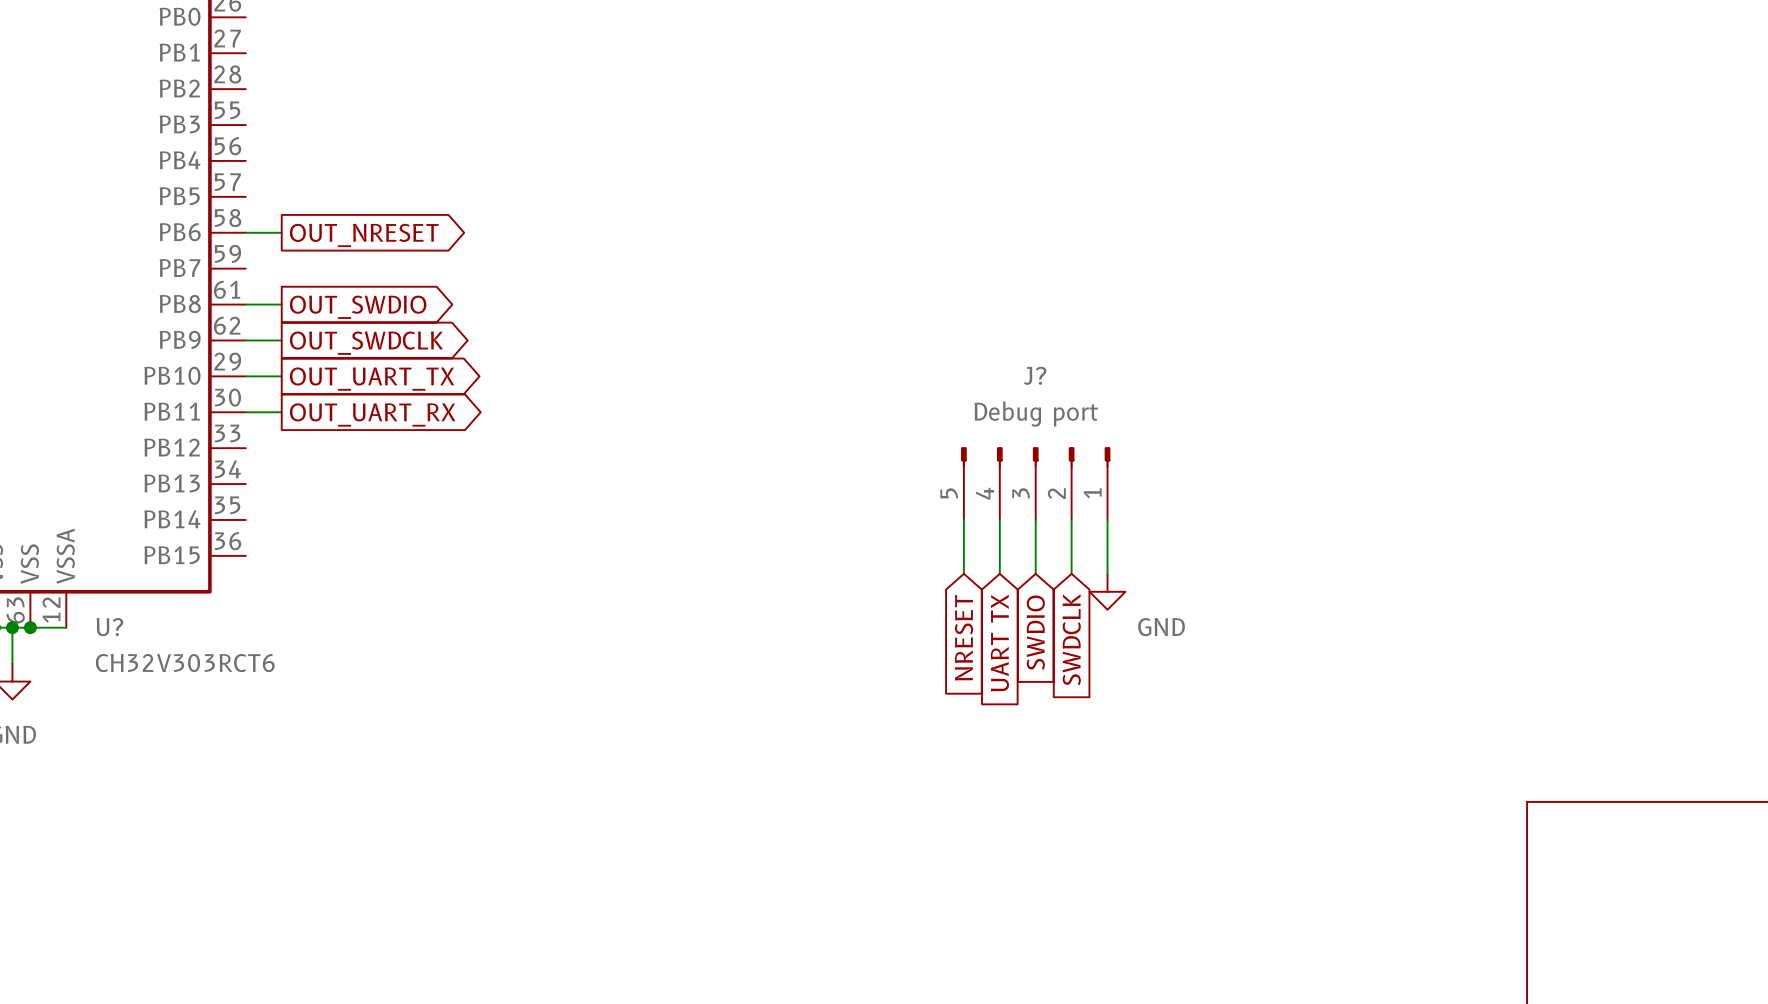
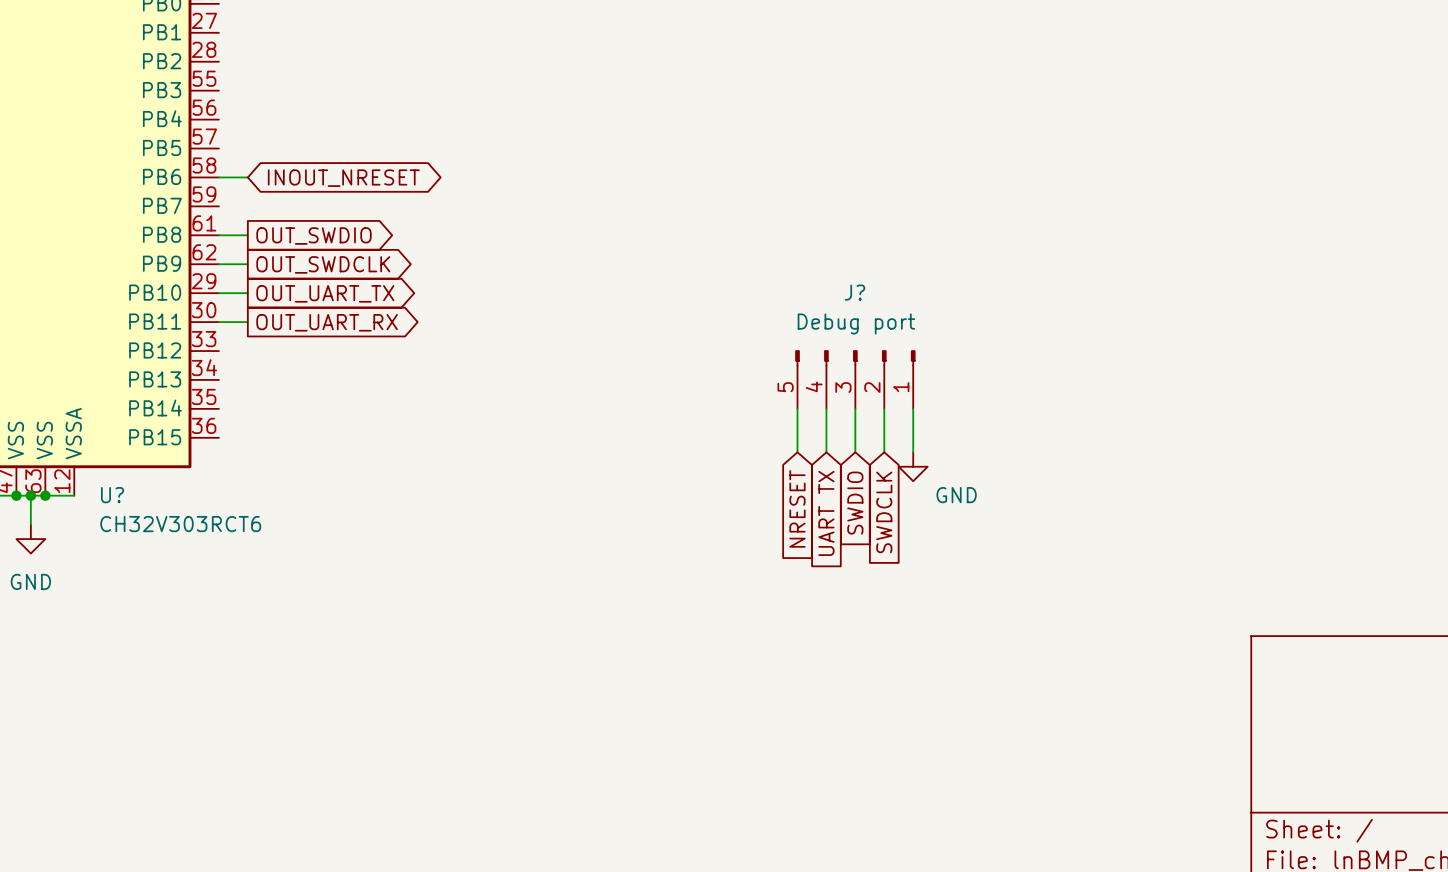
global label shape: output (364, 235) -> bidirectional (343, 178)
global label: OUT_NRESET (364, 235) -> INOUT_NRESET (343, 178)

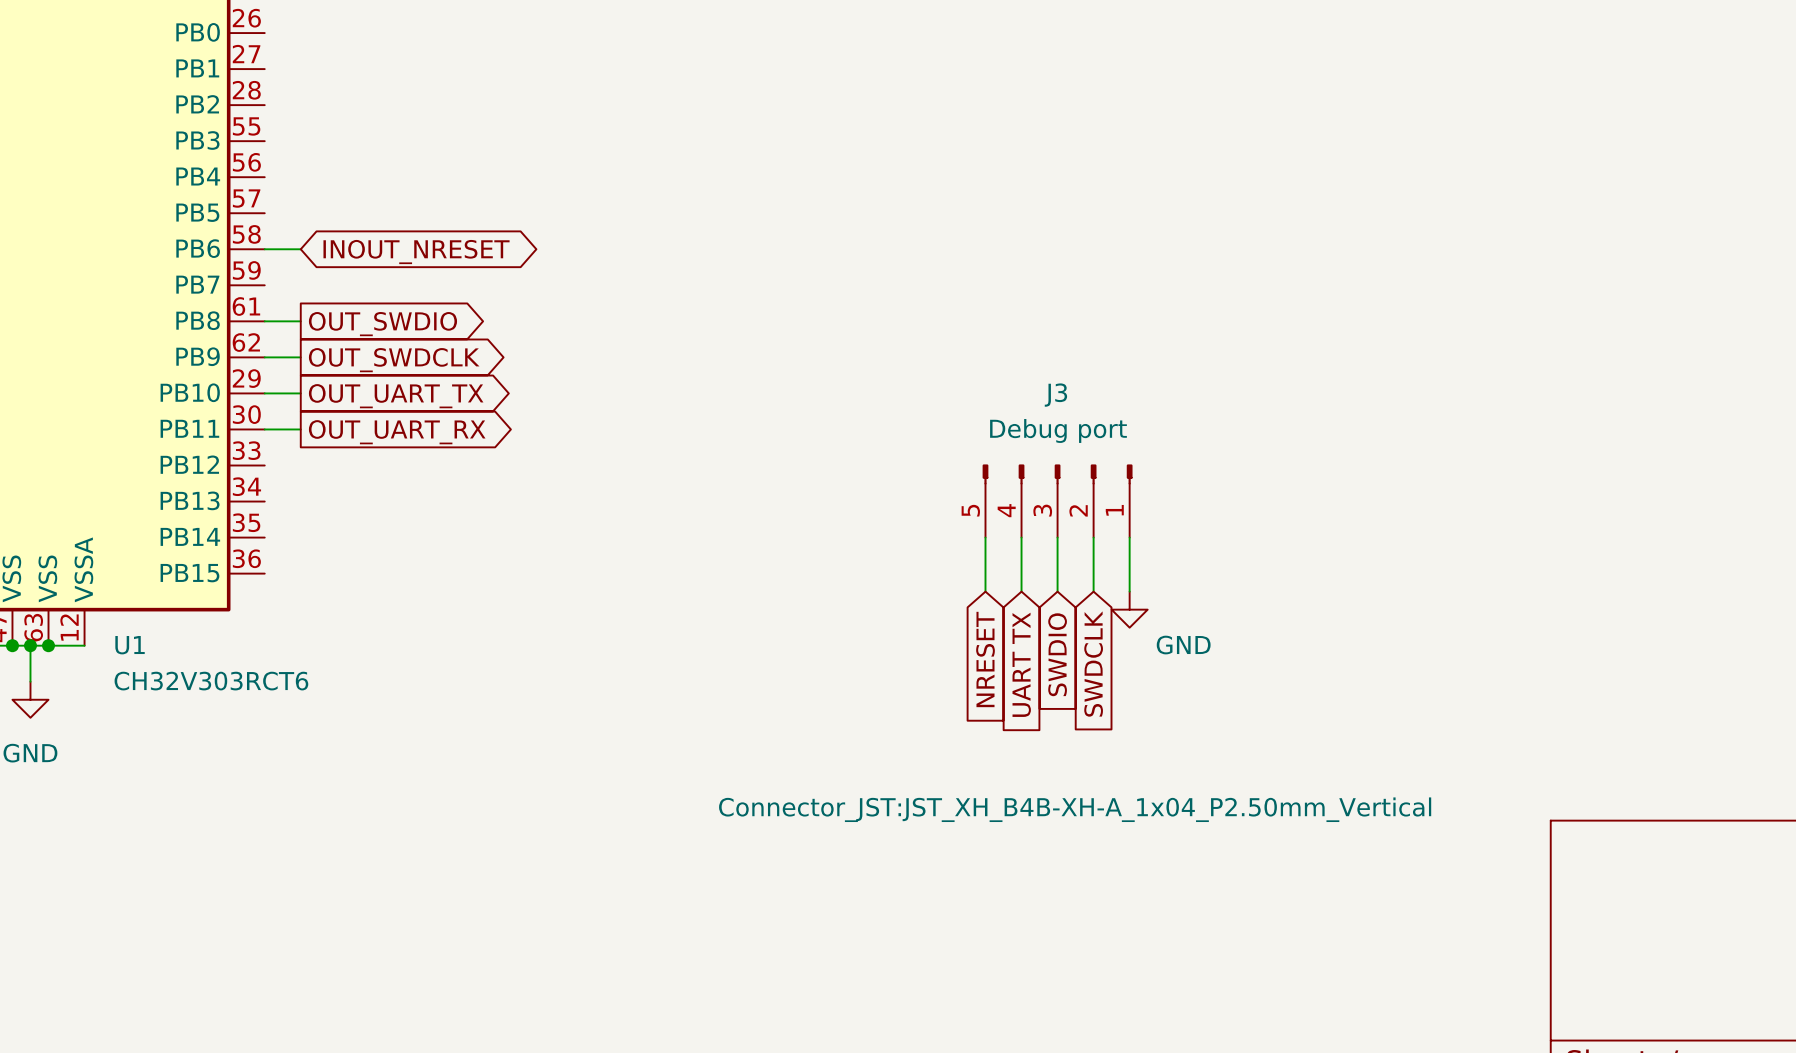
J? name: J? (855, 292) -> J3 (1055, 395)
U? name: U? (112, 495) -> U1 (130, 645)
J? text: none -> Connector_JST:JST_XH_B4B-XH-A_1x04_P2.50mm_Vertical (1075, 809)

